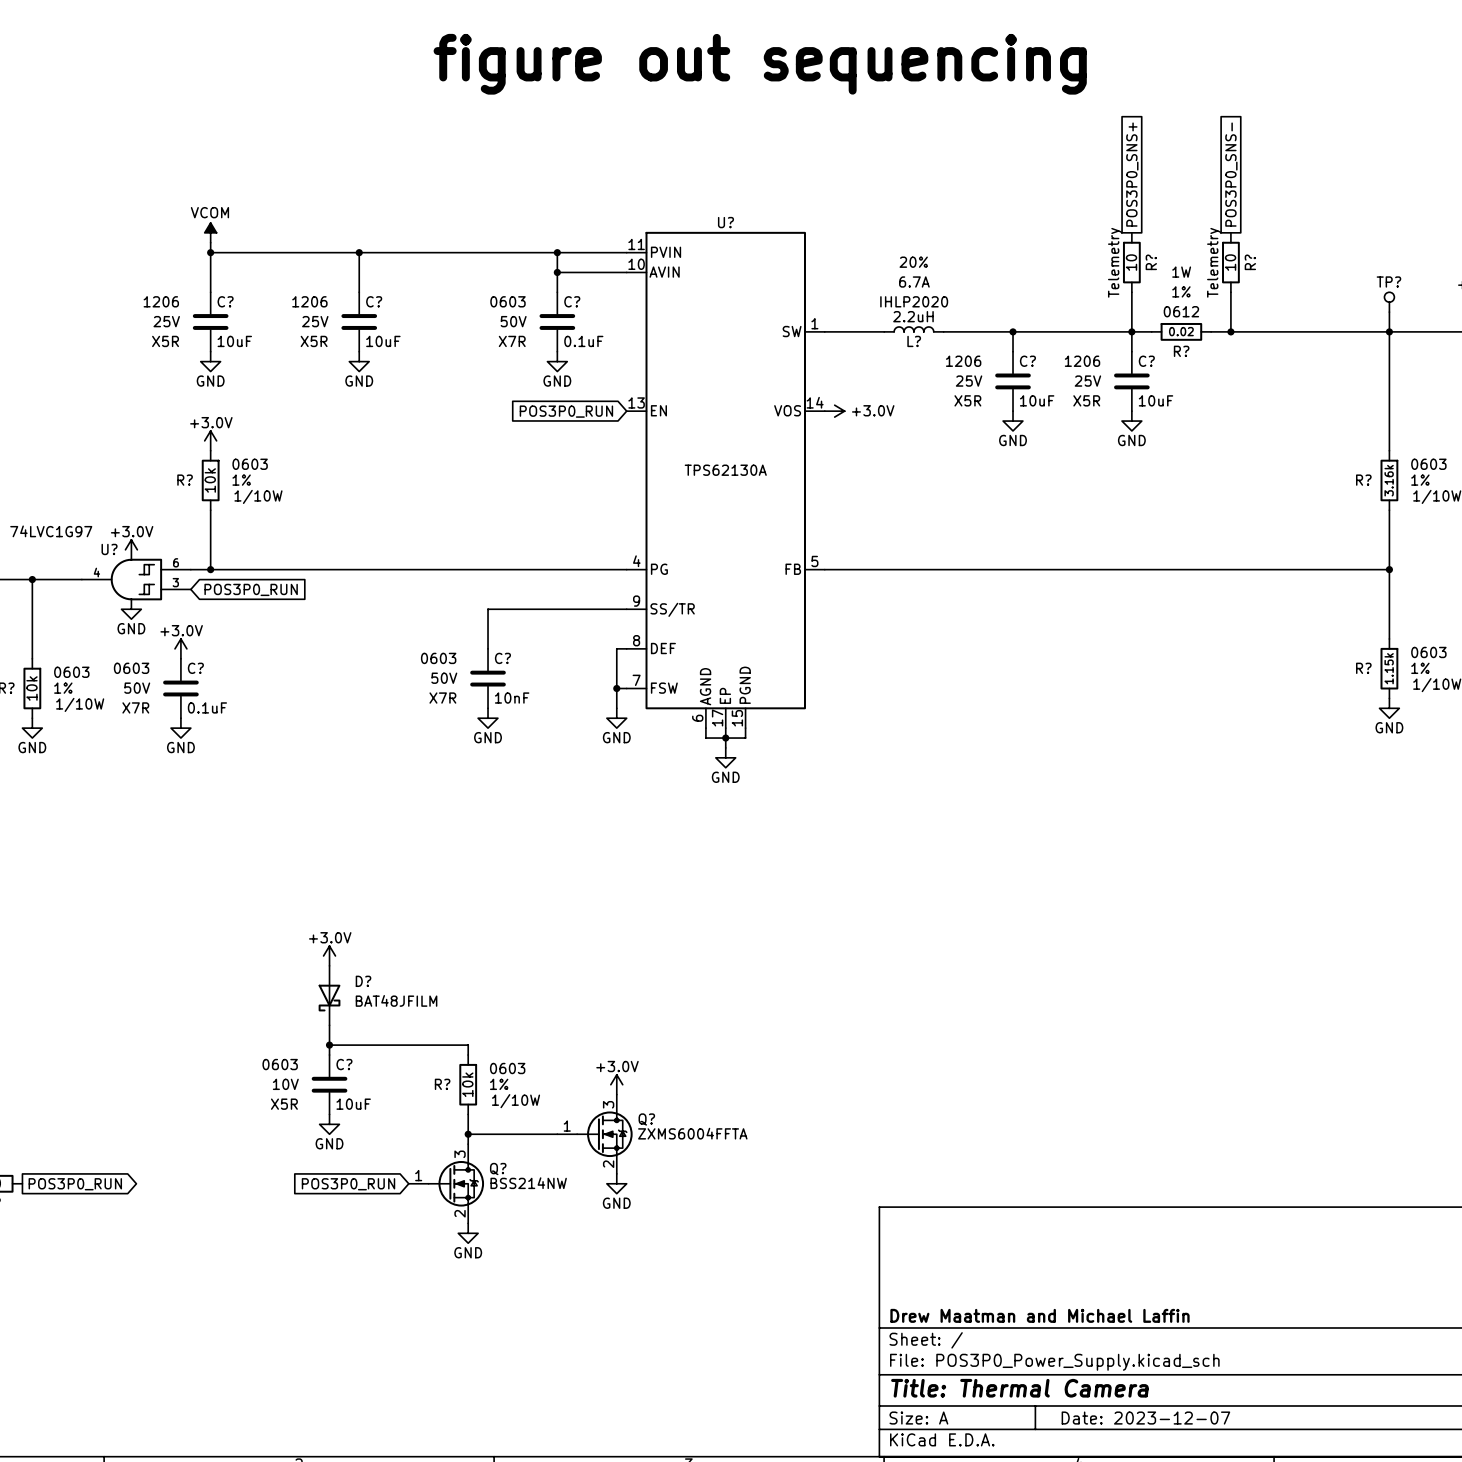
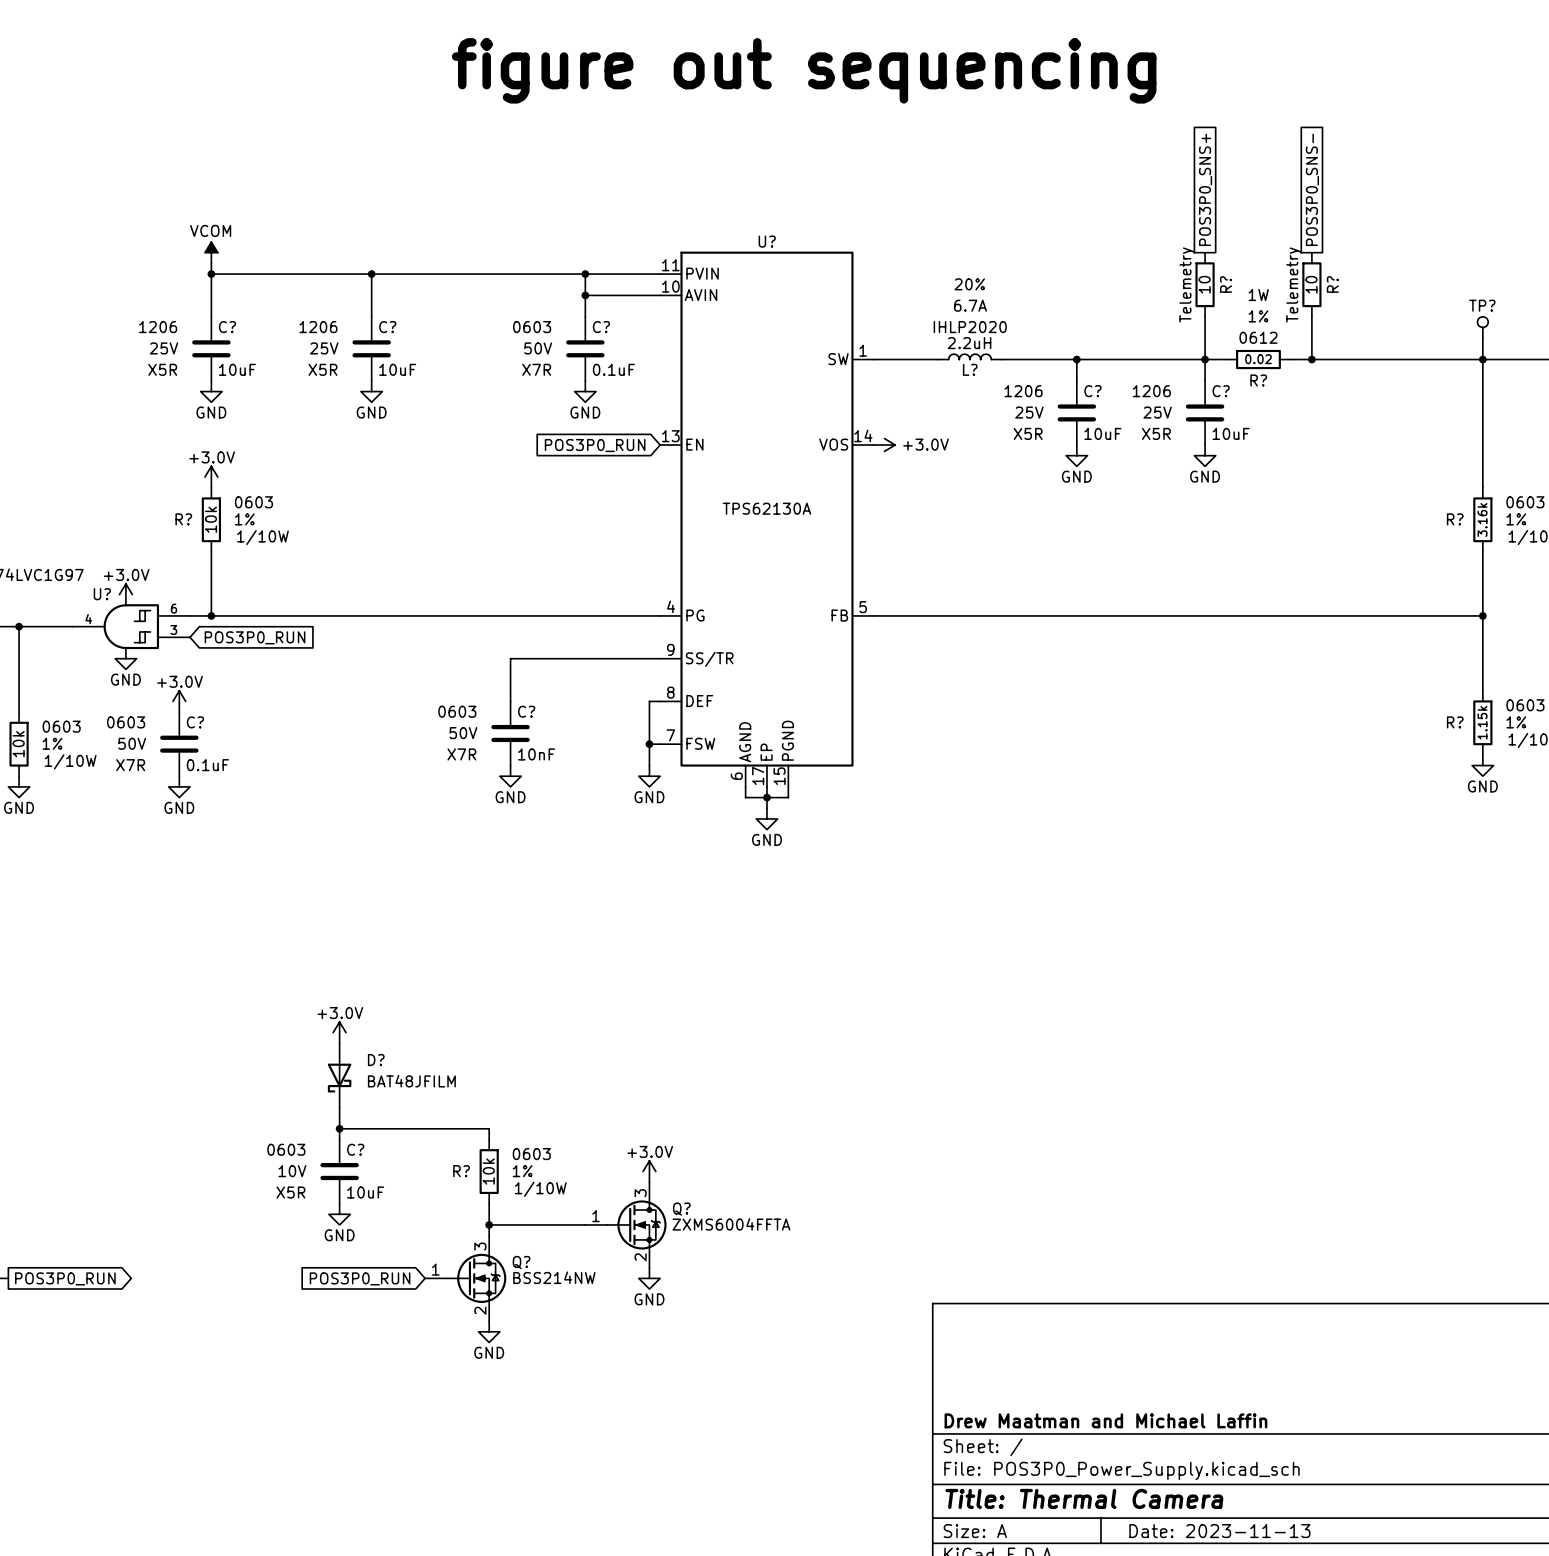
title block: Date: 2023-12-07 (1145, 1418) -> Date: 2023-11-13 (1219, 1531)

